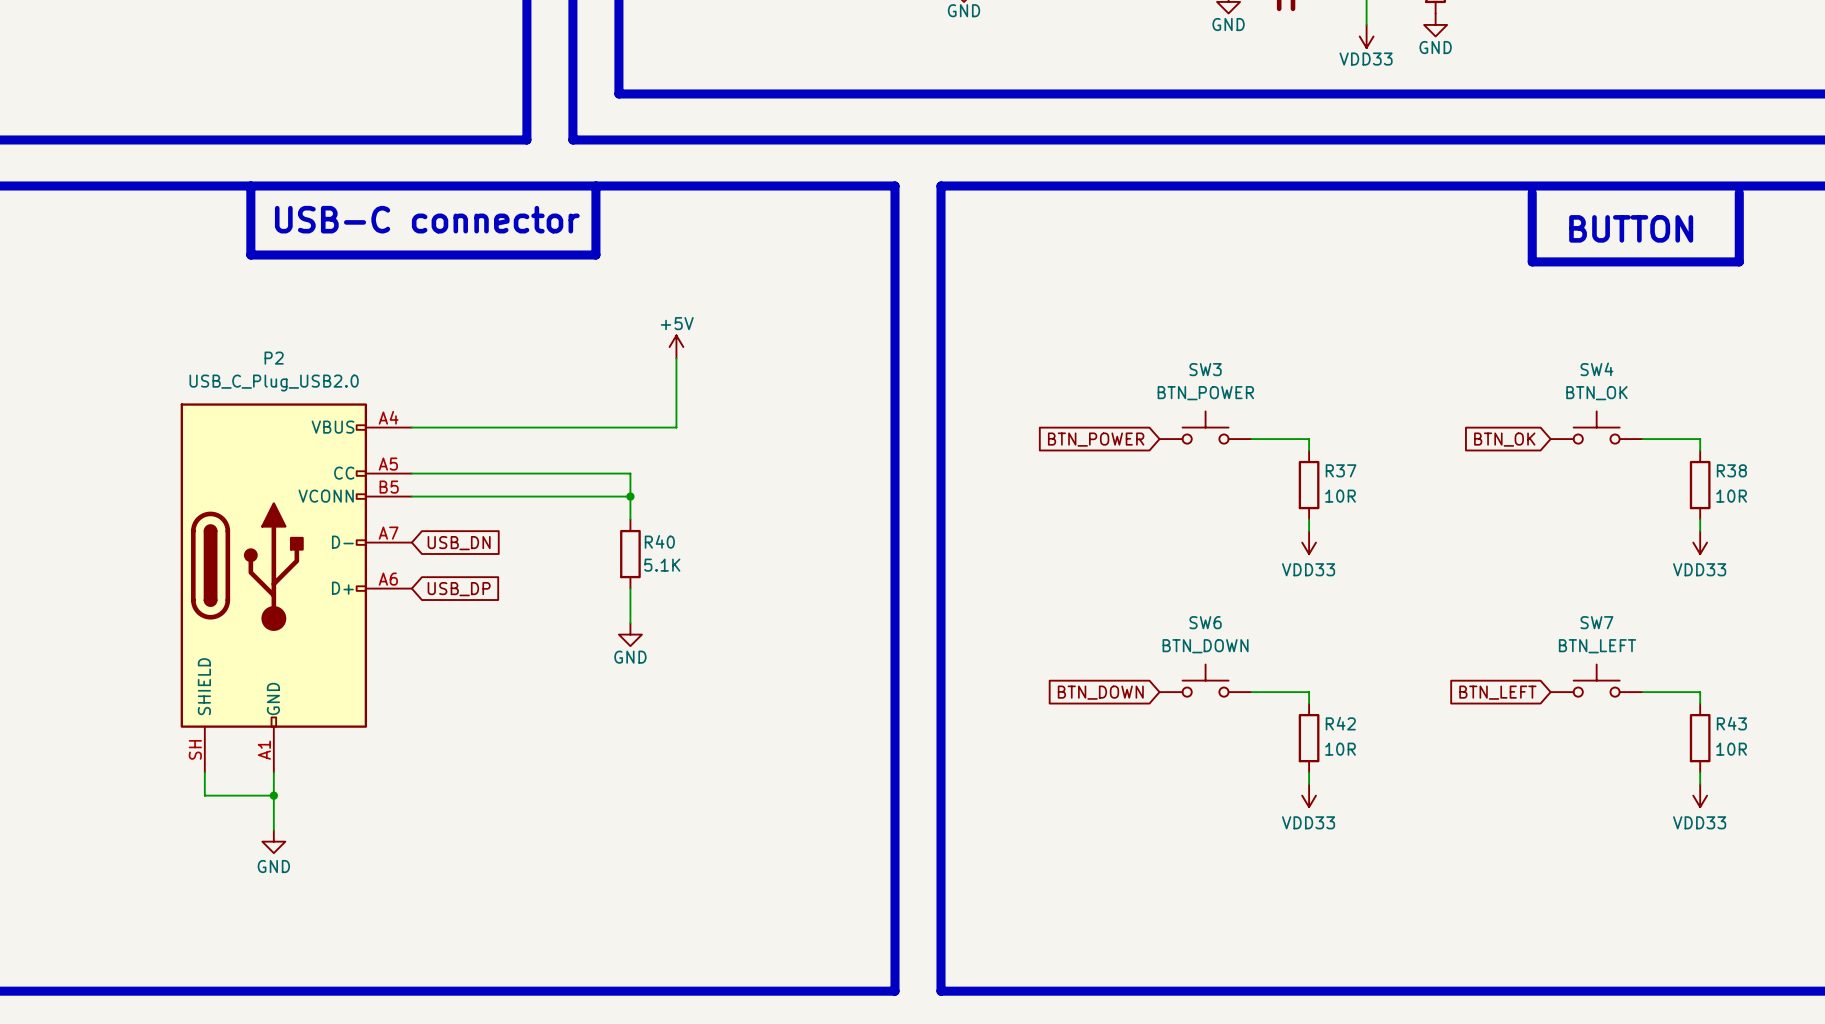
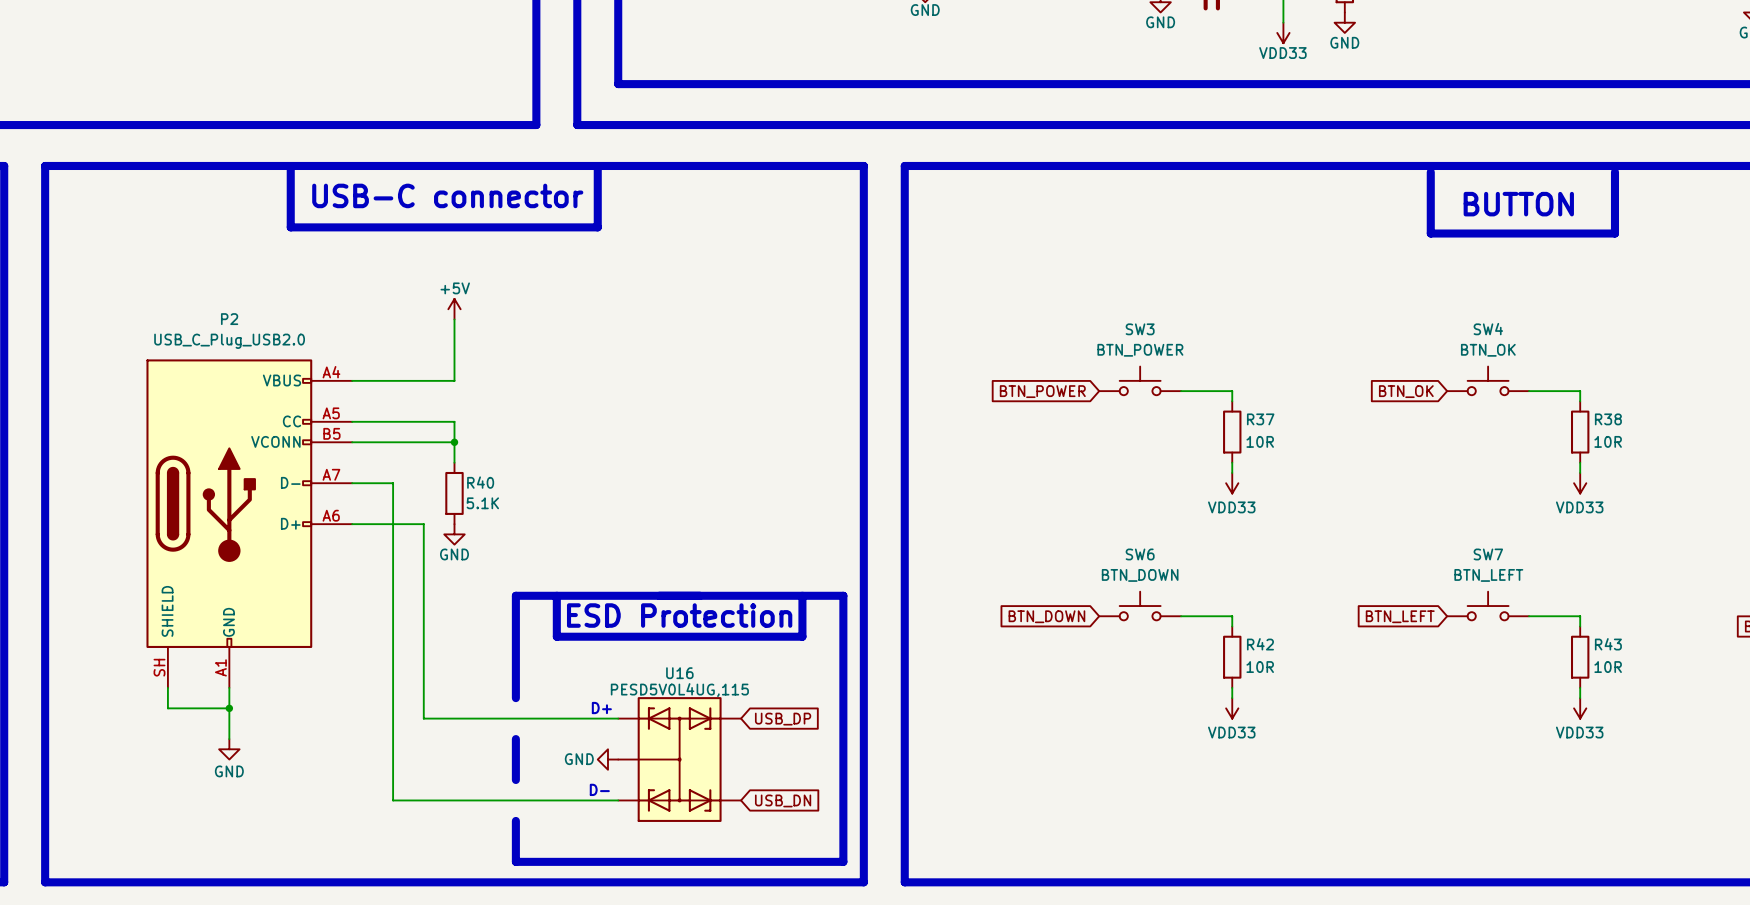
power symbol: none -> +5V (454, 309)
power symbol: +5V (676, 347) -> none
wire: (676, 358) (676, 427) (434, 427) -> (454, 319) (454, 380)
wire: (434, 473) (630, 473) (630, 519) -> (454, 421) (454, 462)
wire: (434, 496) (630, 496) -> none
junction: none -> (454, 442)
junction: (630, 496) -> none
wire: none -> (352, 483) (393, 483) (393, 800) (618, 800)
global label: USB_DN (459, 543) -> none
R40 position: (630, 554) -> (454, 493)
P2 position: (296, 588) -> (249, 523)
wire: none -> (352, 524) (423, 524) (423, 718) (618, 718)
wire: (630, 588) (630, 623) -> none
global label: USB_DP (459, 589) -> none
power symbol: none -> GND (454, 534)
power symbol: GND (630, 634) -> none
line: none -> (556, 595) (556, 636) (802, 636) (802, 595)
text: none -> ESD Protection (679, 615)
wire: (204, 772) (204, 795) (273, 795) -> (167, 687) (167, 708) (229, 708)
wire: (273, 772) (273, 830) -> (229, 687) (229, 739)
line: none -> (515, 698) (515, 595) (843, 595) (843, 861) (515, 861) (515, 820)
junction: none -> (229, 708)
junction: (273, 795) -> none
text: none -> D+ (601, 708)
global label: none -> USB_DP (783, 719)
line: none -> (515, 739) (515, 779)
power symbol position: GND (273, 841) -> GND (229, 749)
power symbol: none -> GND (607, 759)
U16: none -> PESD5V0L4UG,115 (679, 759)
text: none -> D- (599, 789)
global label: none -> USB_DN (783, 800)

